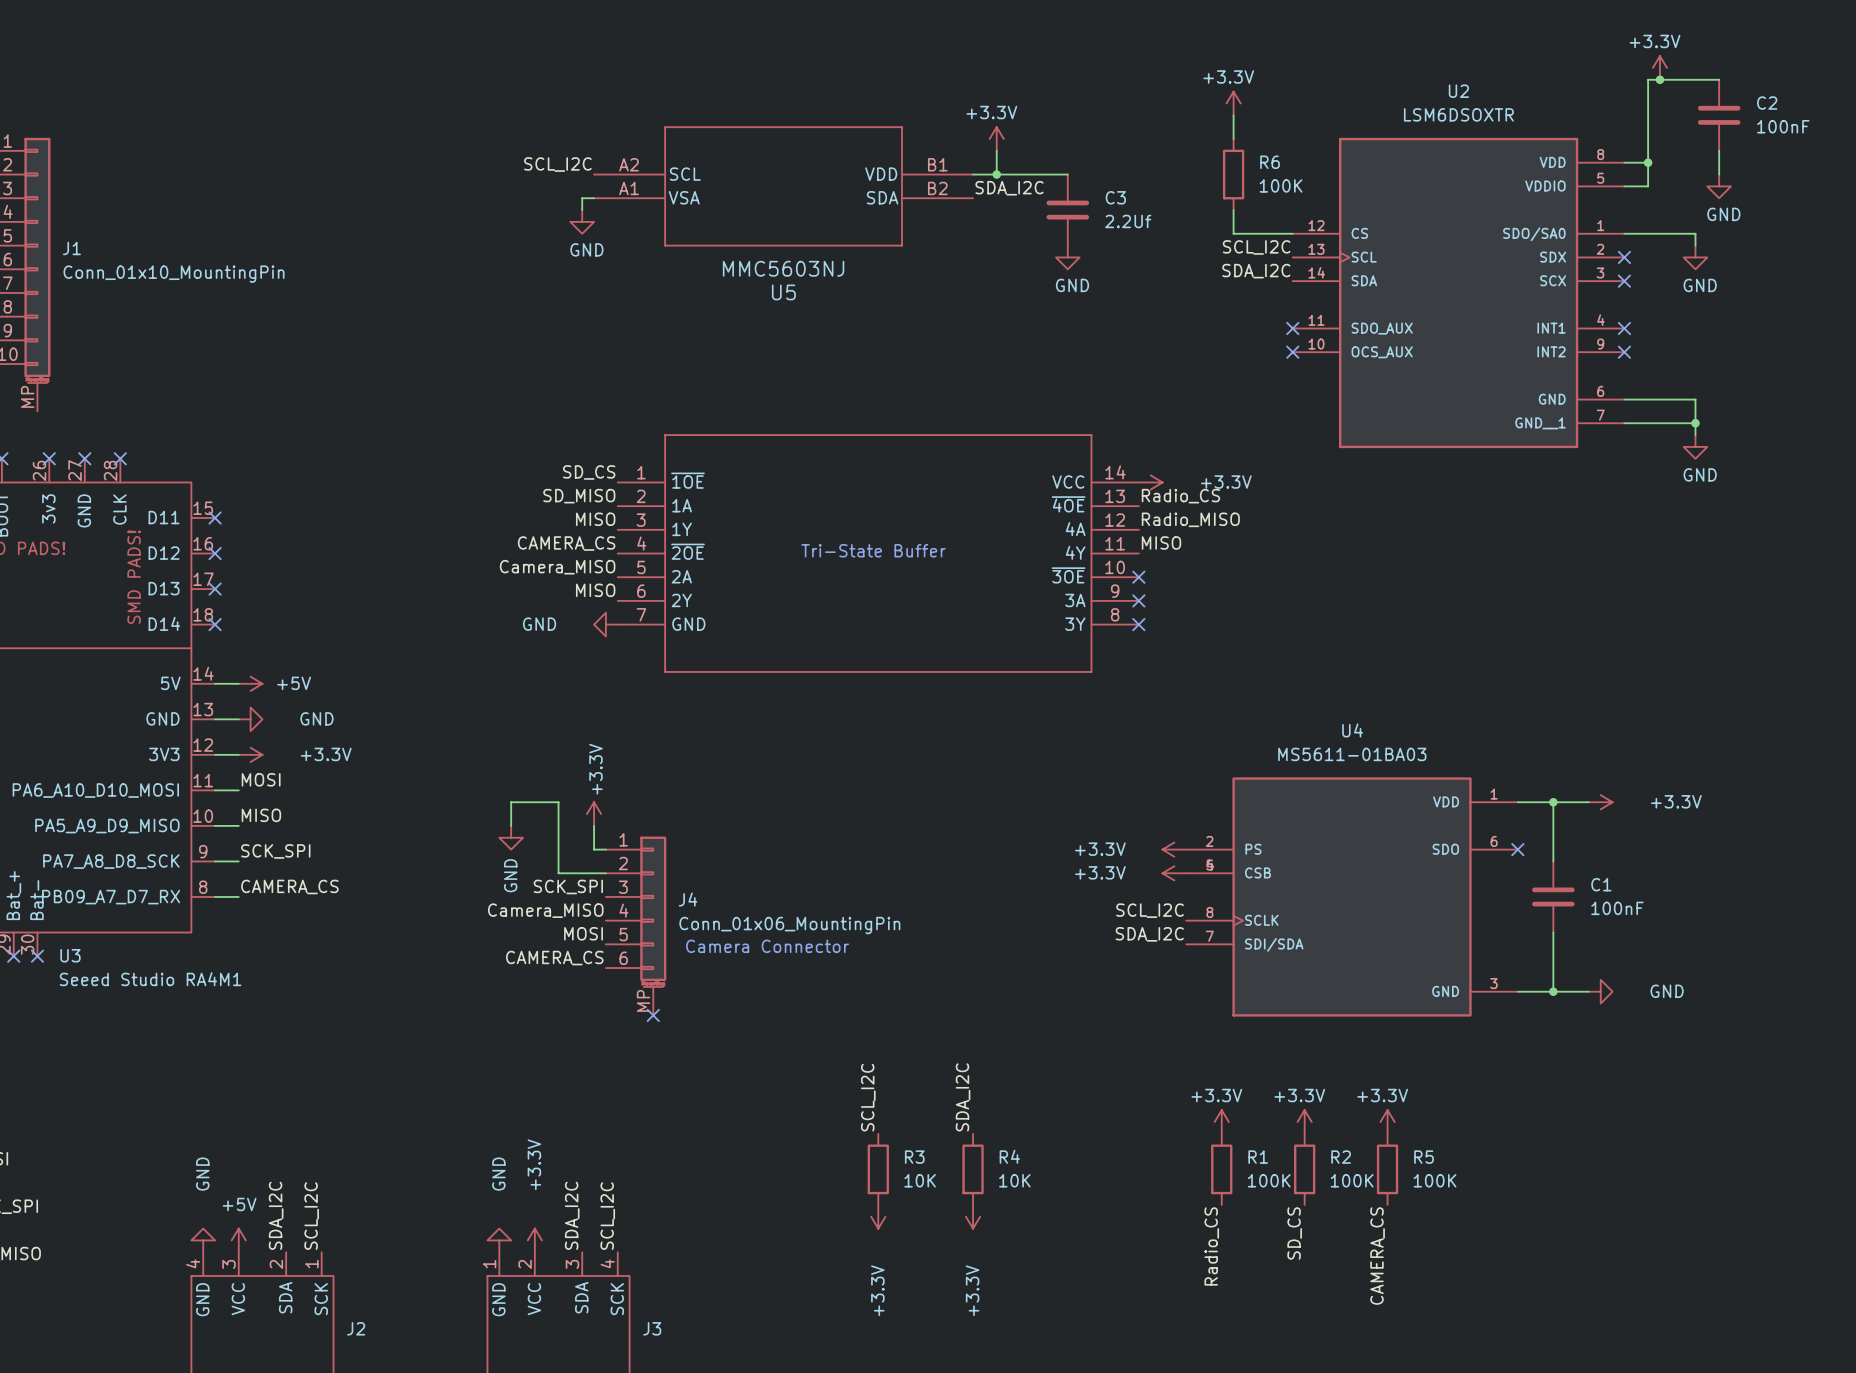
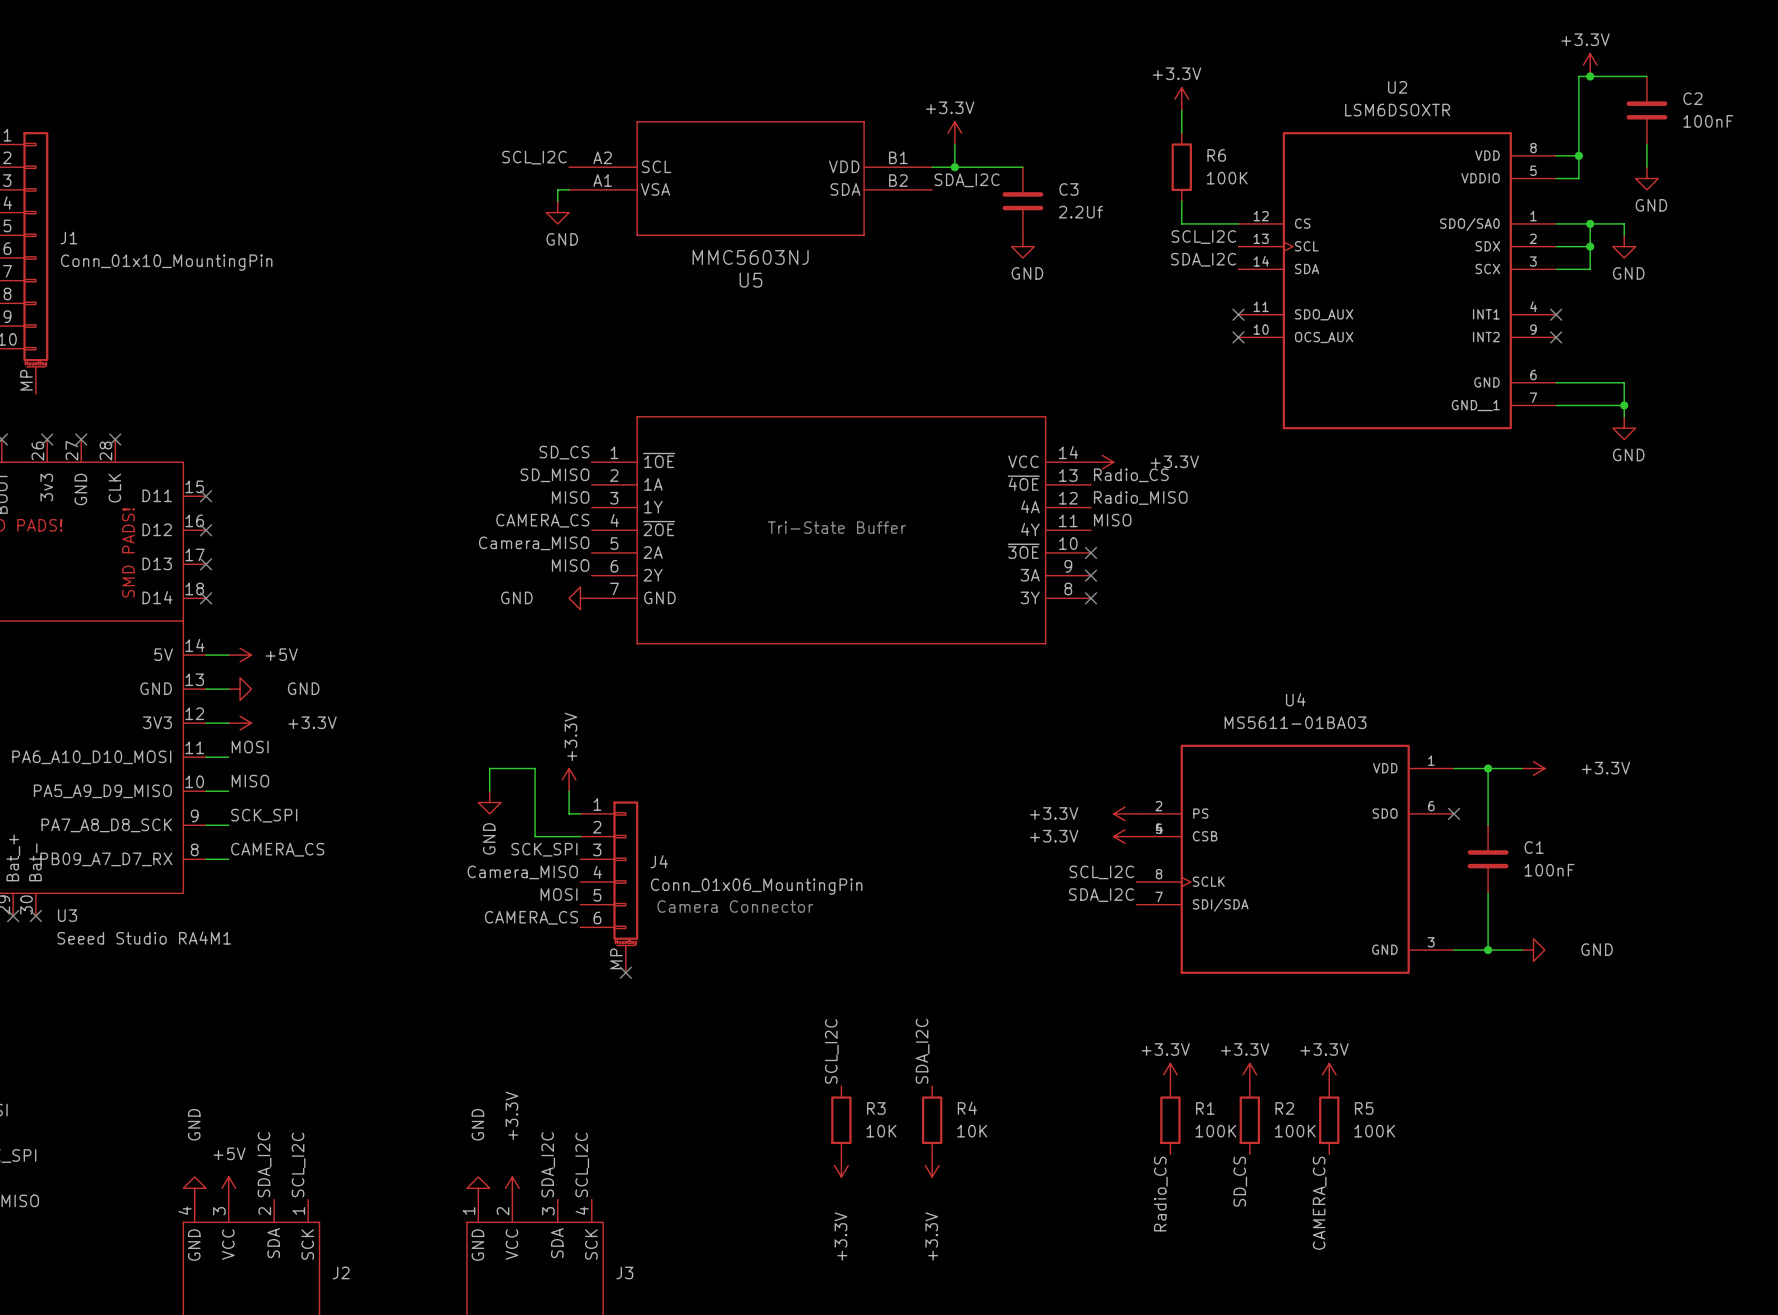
wire: none -> (1590, 223) (1590, 269) (1556, 269)
junction: none -> (1590, 223)
wire: none -> (1556, 246) (1590, 246)
no-connect mark: (1624, 257) -> none
junction: none -> (1590, 246)
no-connect mark: (1624, 281) -> none

